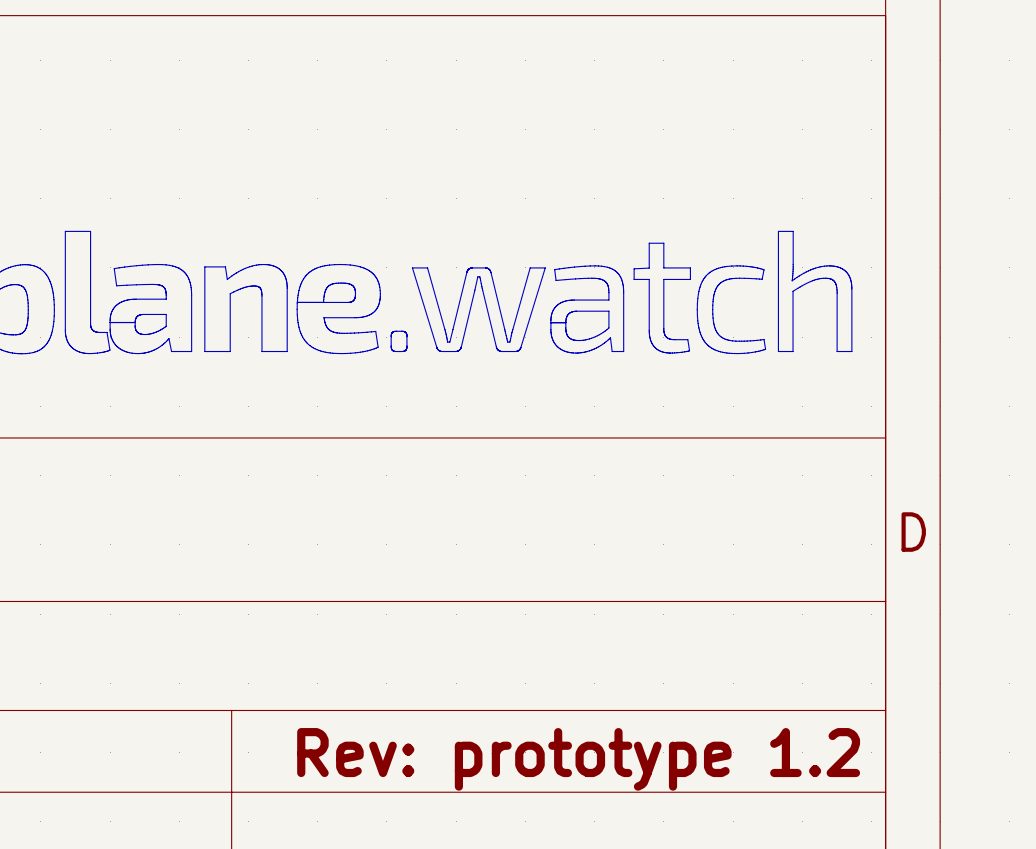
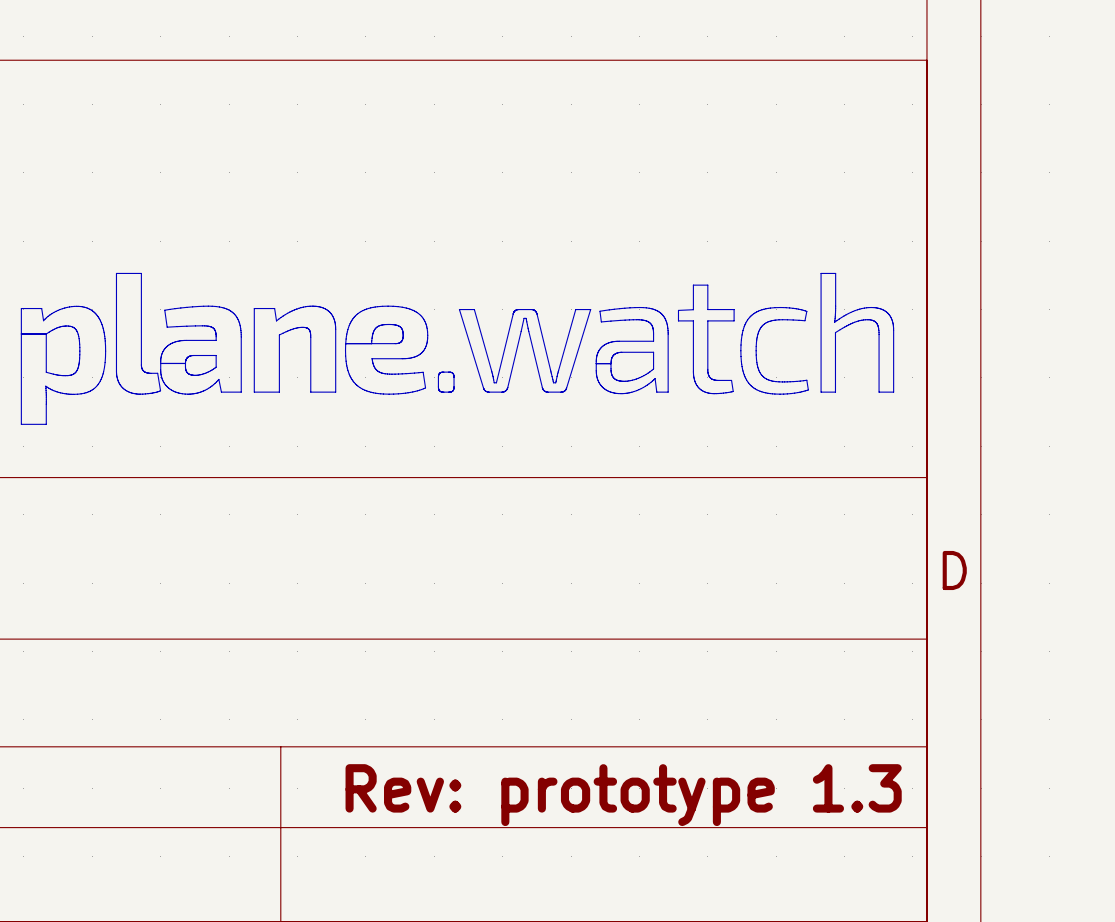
title block: Rev: prototype 1.2 (578, 759) -> Rev: prototype 1.3 (623, 795)

